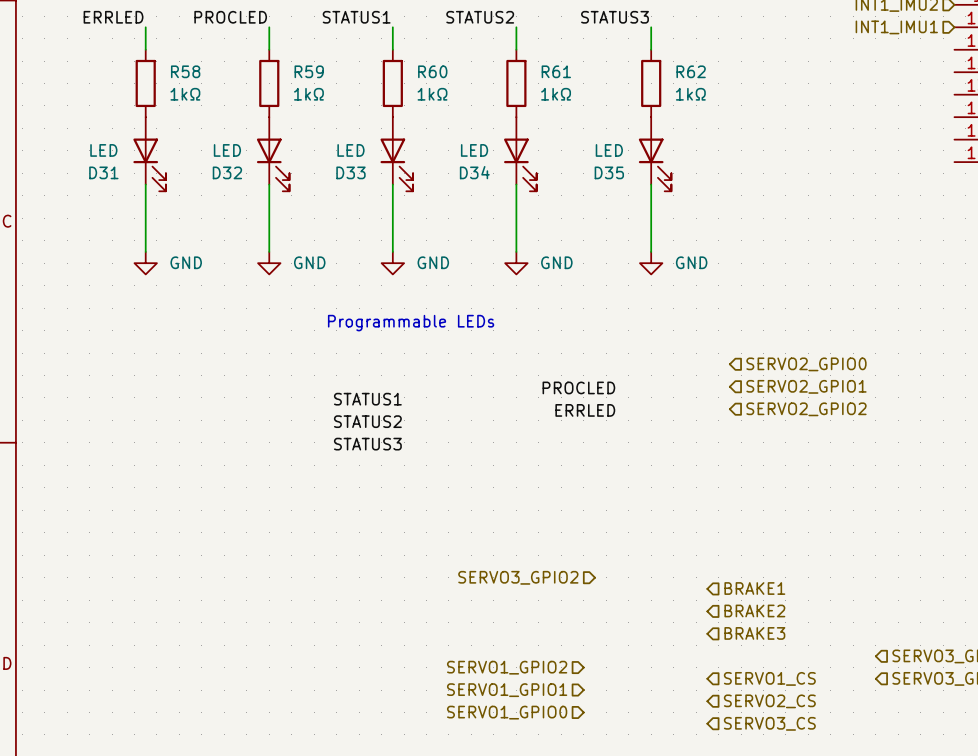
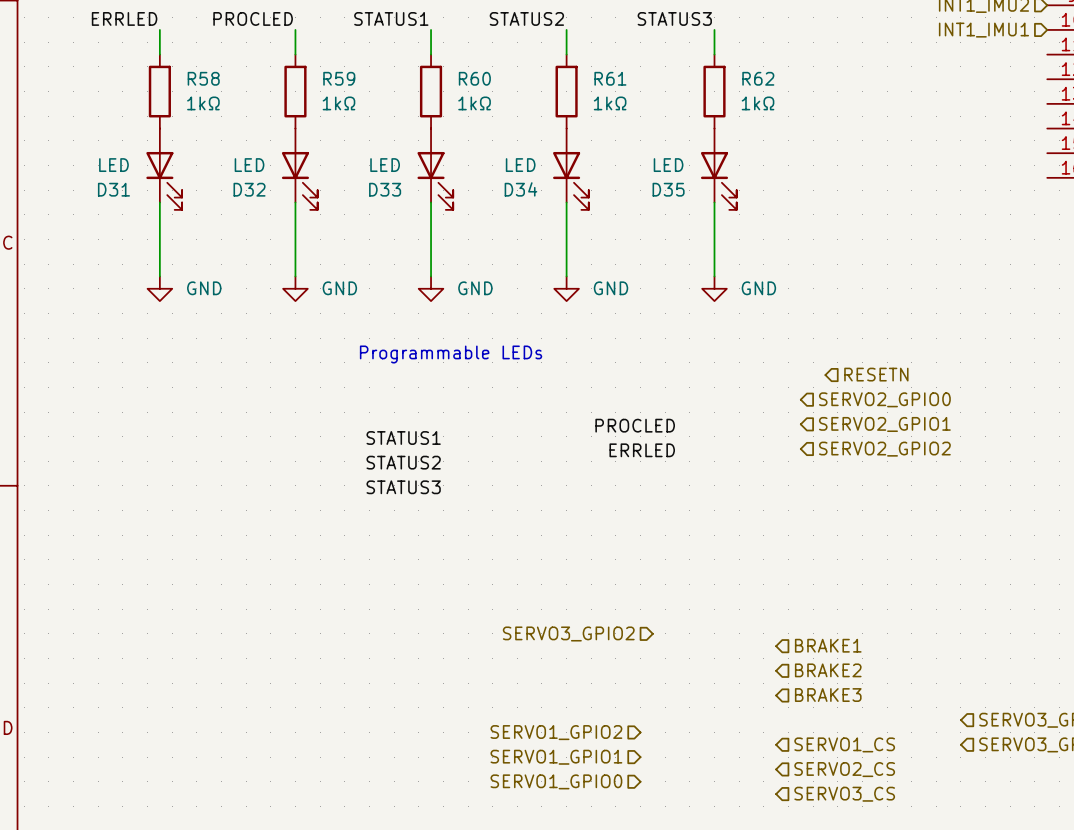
hierarchical label: none -> RESETN (876, 374)

